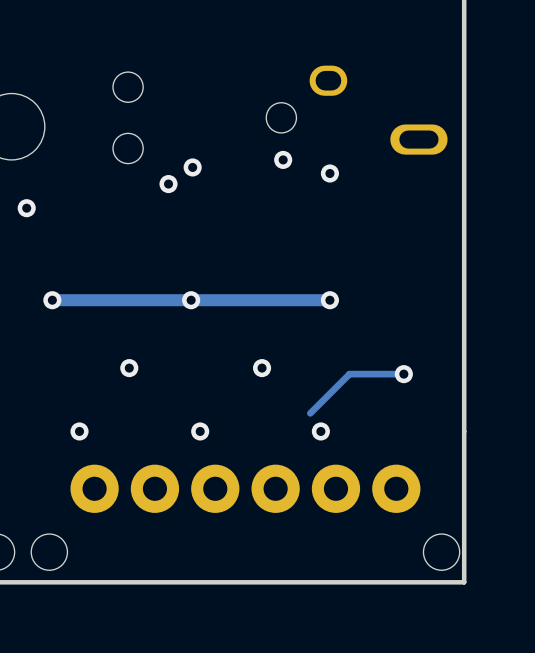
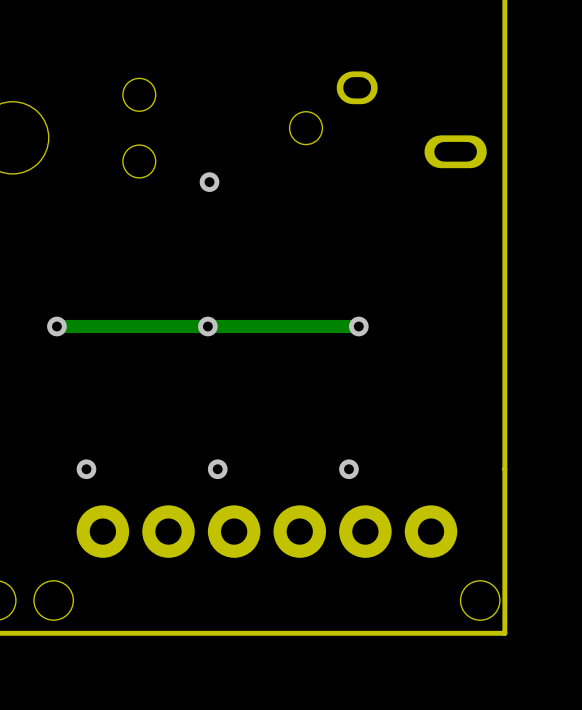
via: (283, 159) -> none
via: (329, 173) -> none
via: (168, 184) -> none
via: (26, 208) -> none
via: (129, 368) -> none
via: (262, 368) -> none
track: (403, 374) (349, 374) (310, 413) -> none
via: (403, 374) -> none

